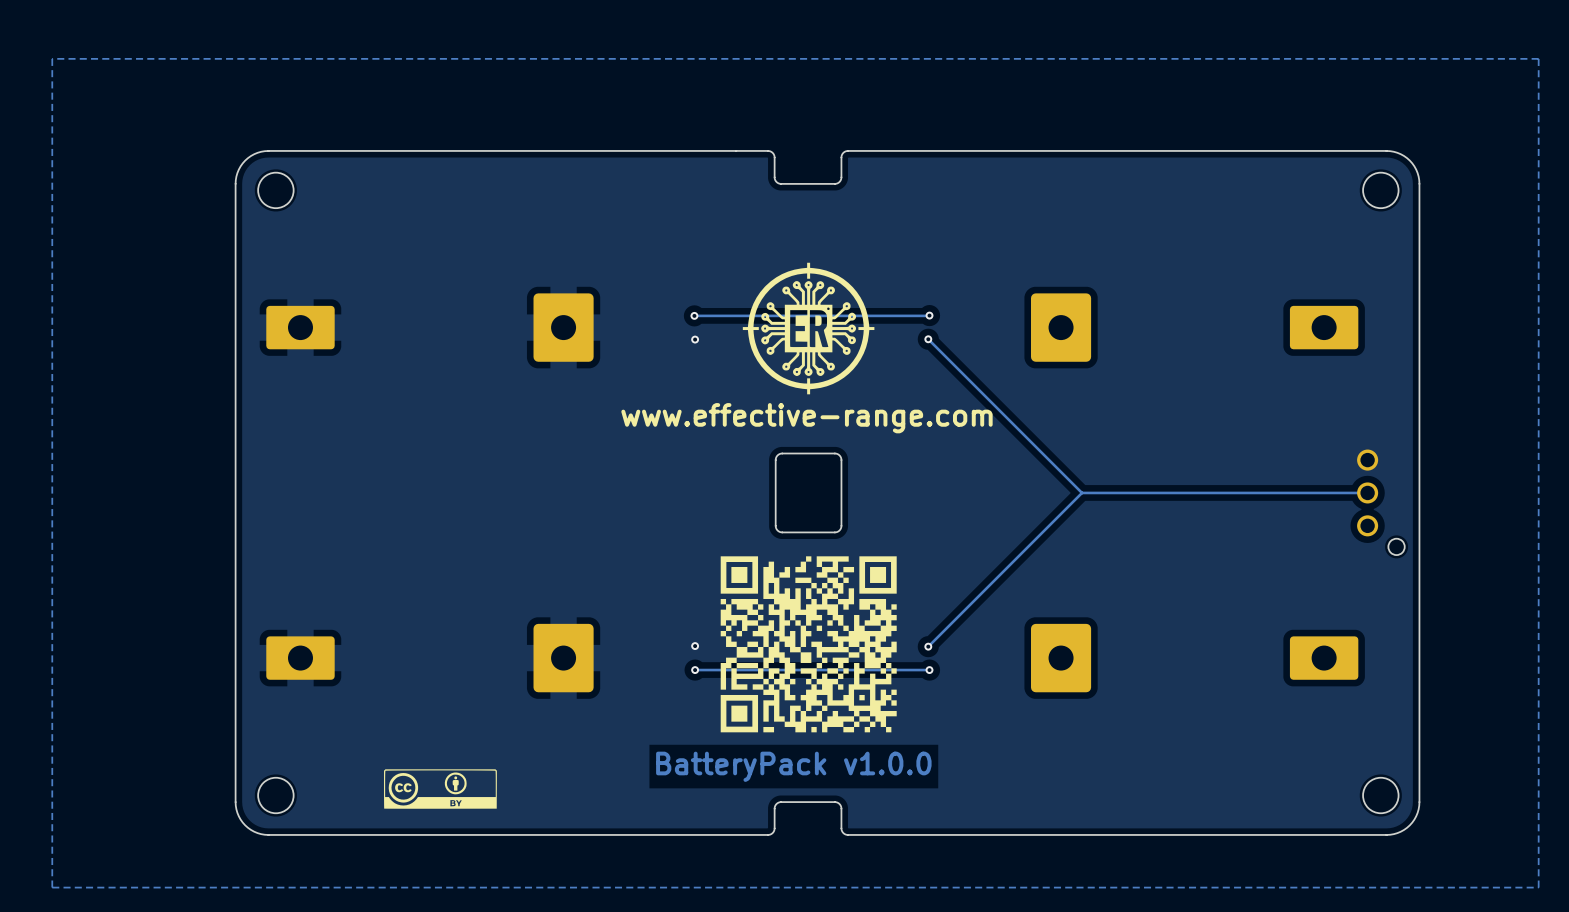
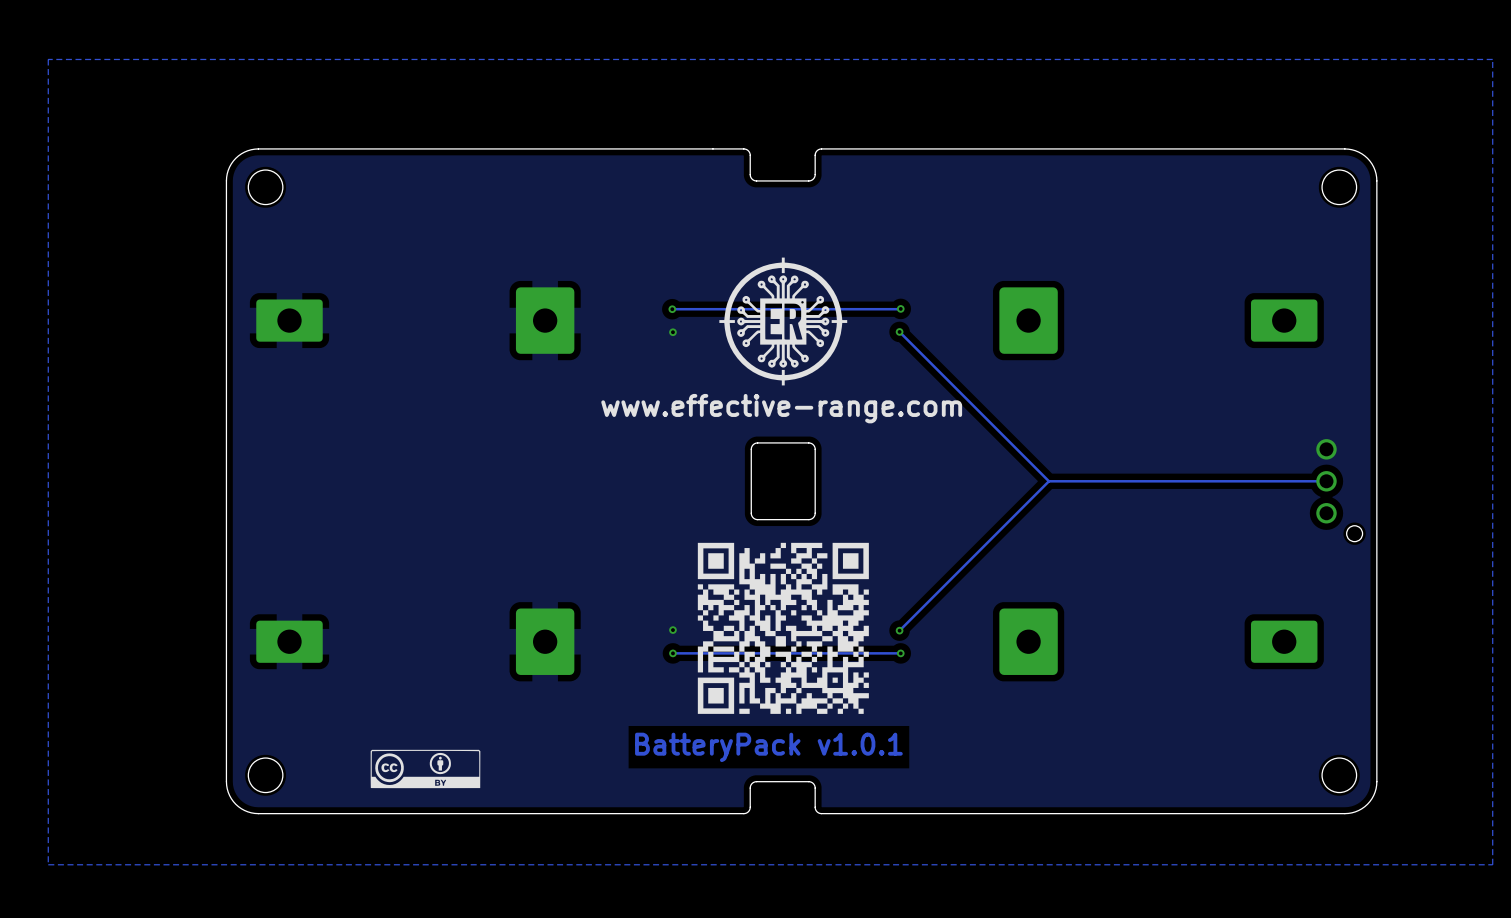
text: BatteryPack v1.0.0 (793, 766) -> BatteryPack v1.0.1 (768, 747)

